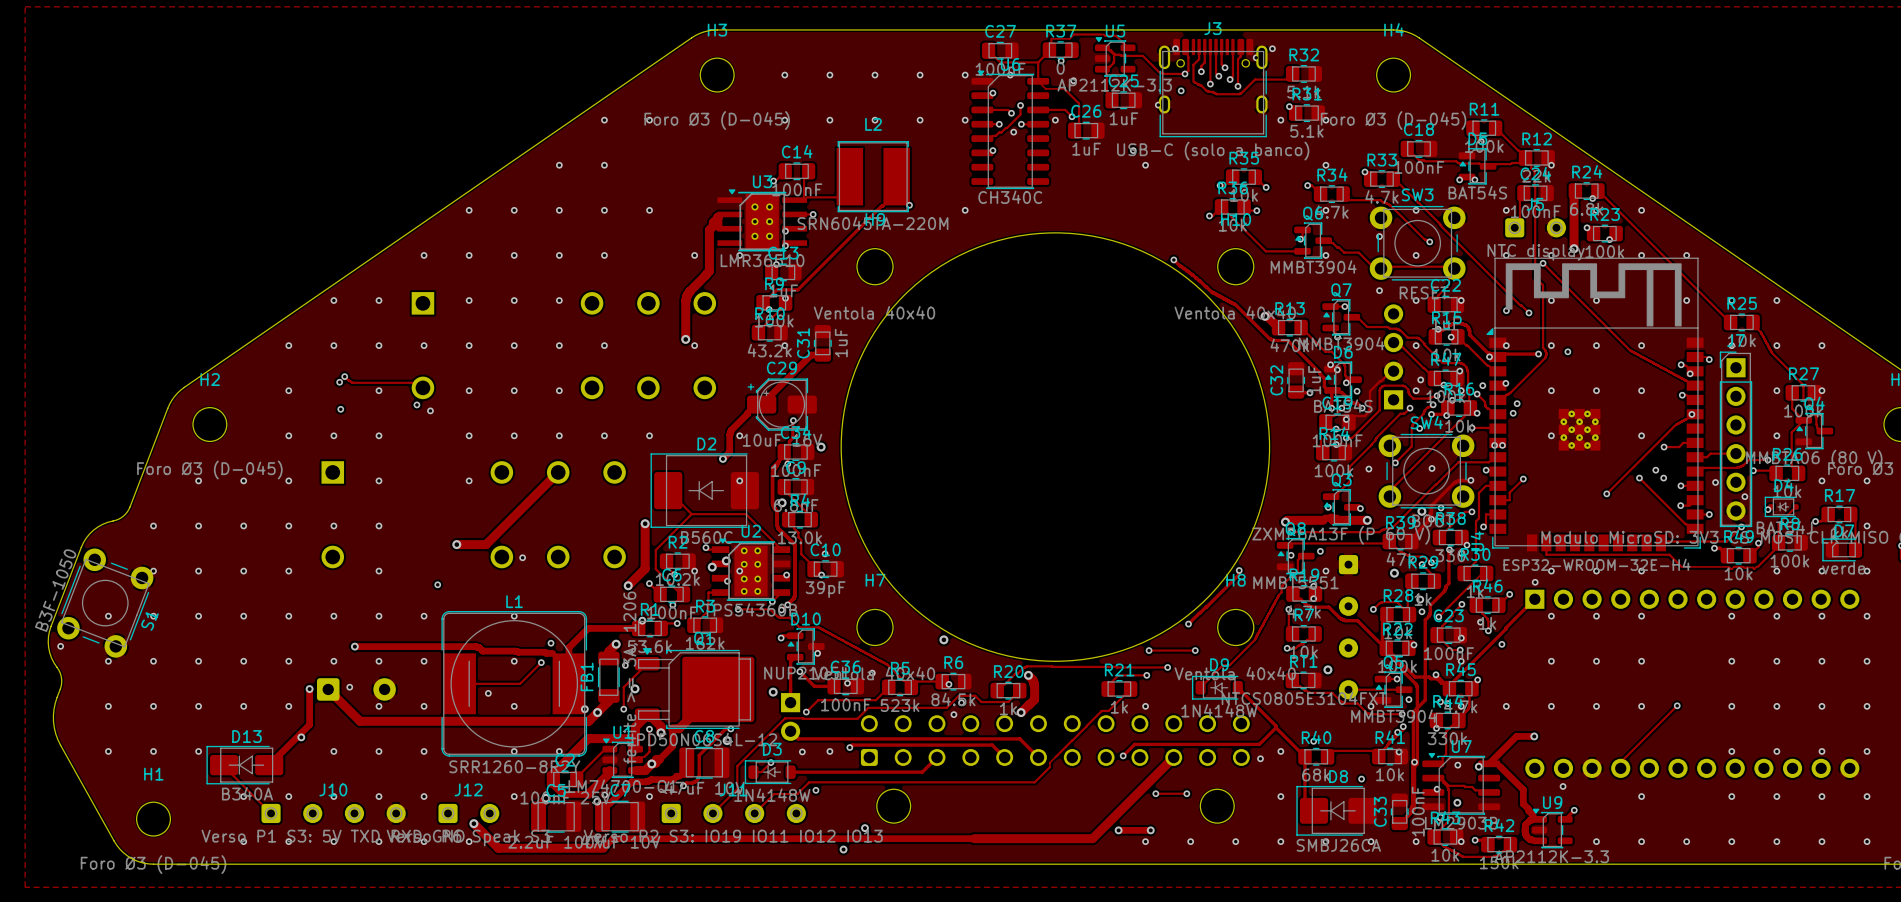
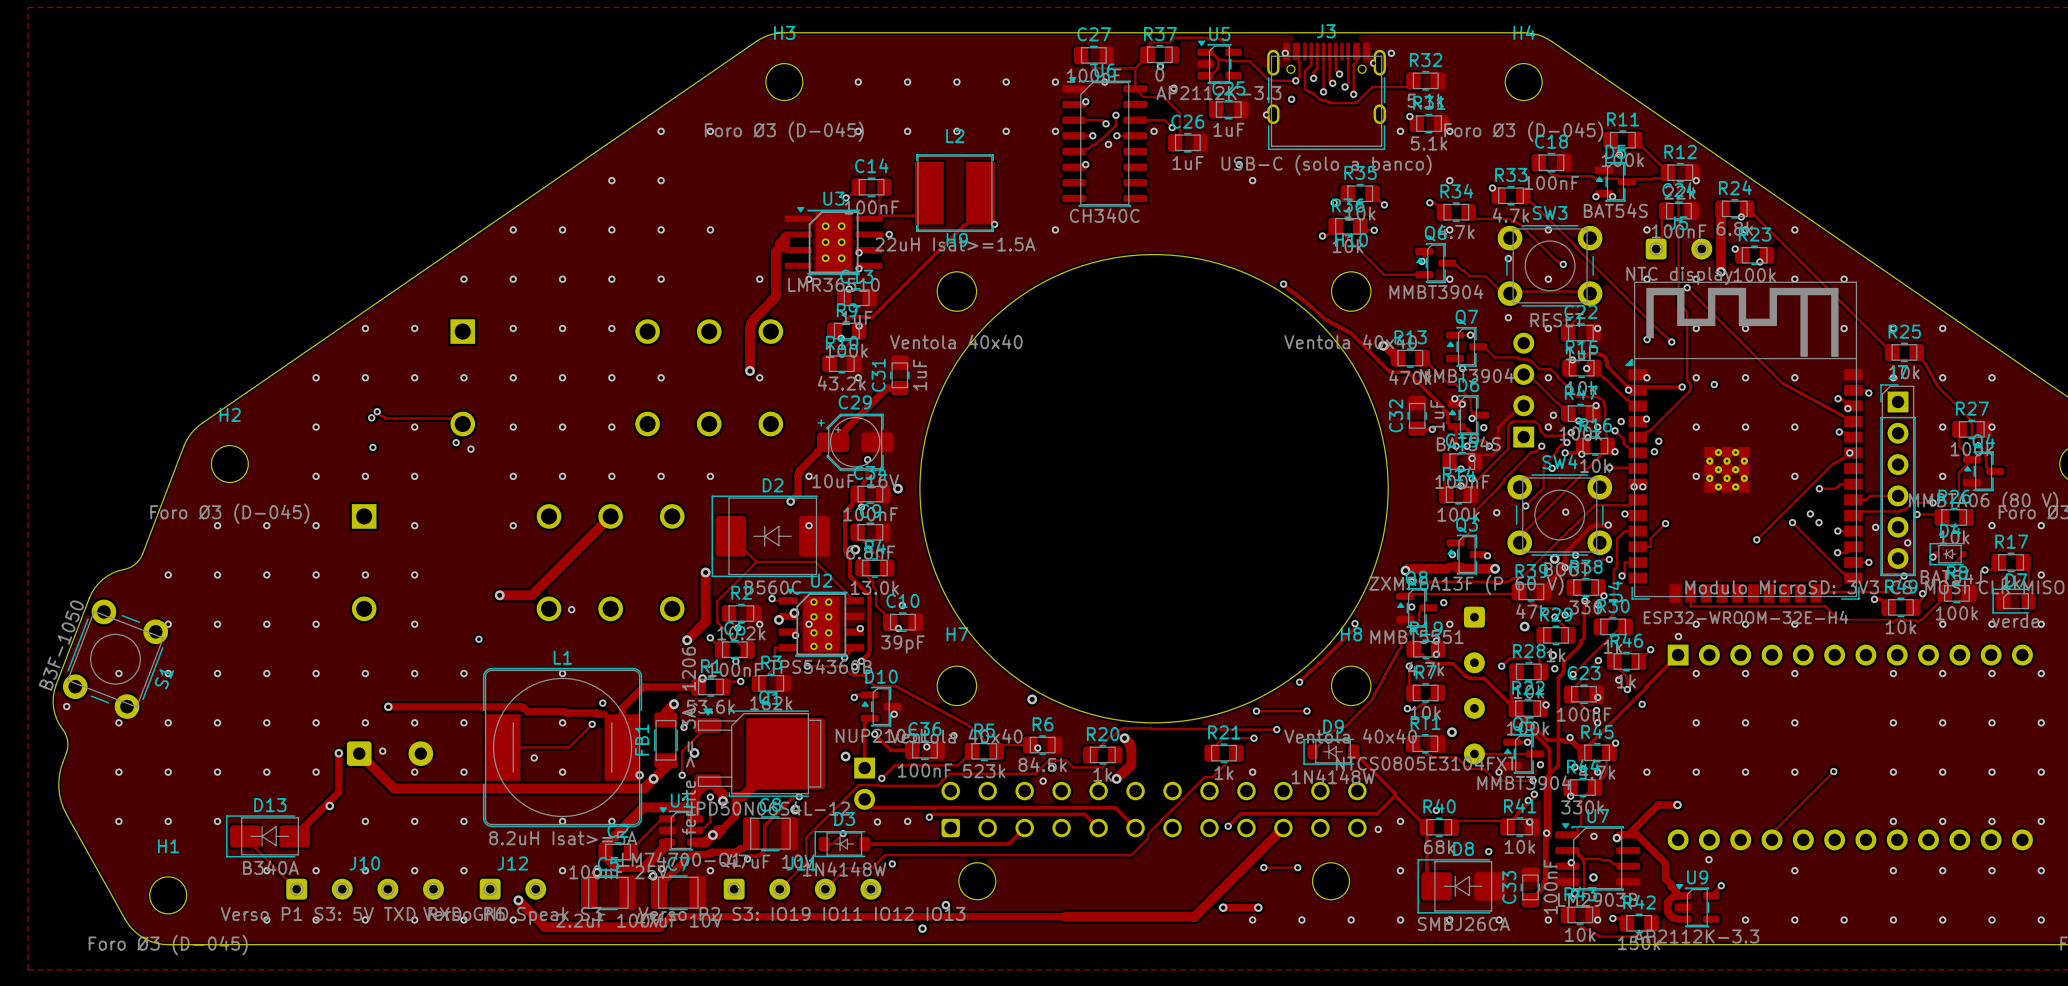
L2 value: SRN6045TA-220M (872, 223) -> 22uH Isat>=1.5A (955, 244)
L1 value: SRR1260-8R2Y (514, 766) -> 8.2uH Isat>=5A (563, 838)

